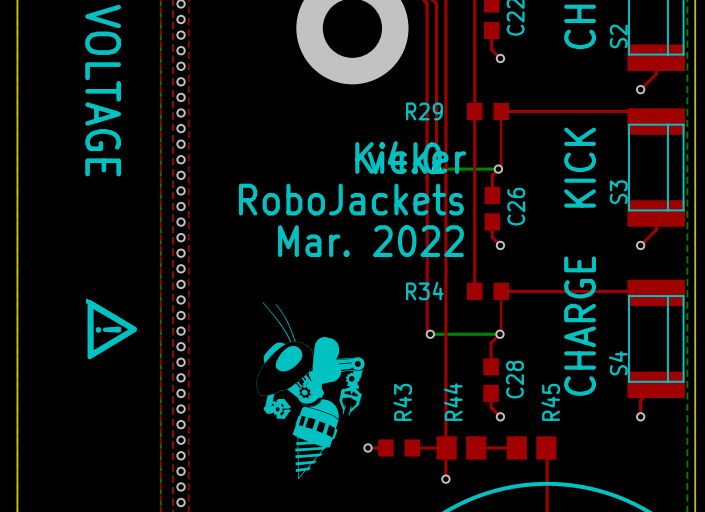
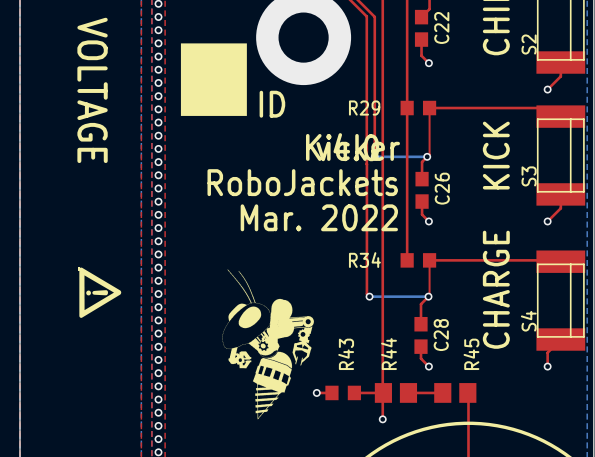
drawing: none -> [180, 43, 247, 116]
text: none -> ID (272, 104)

